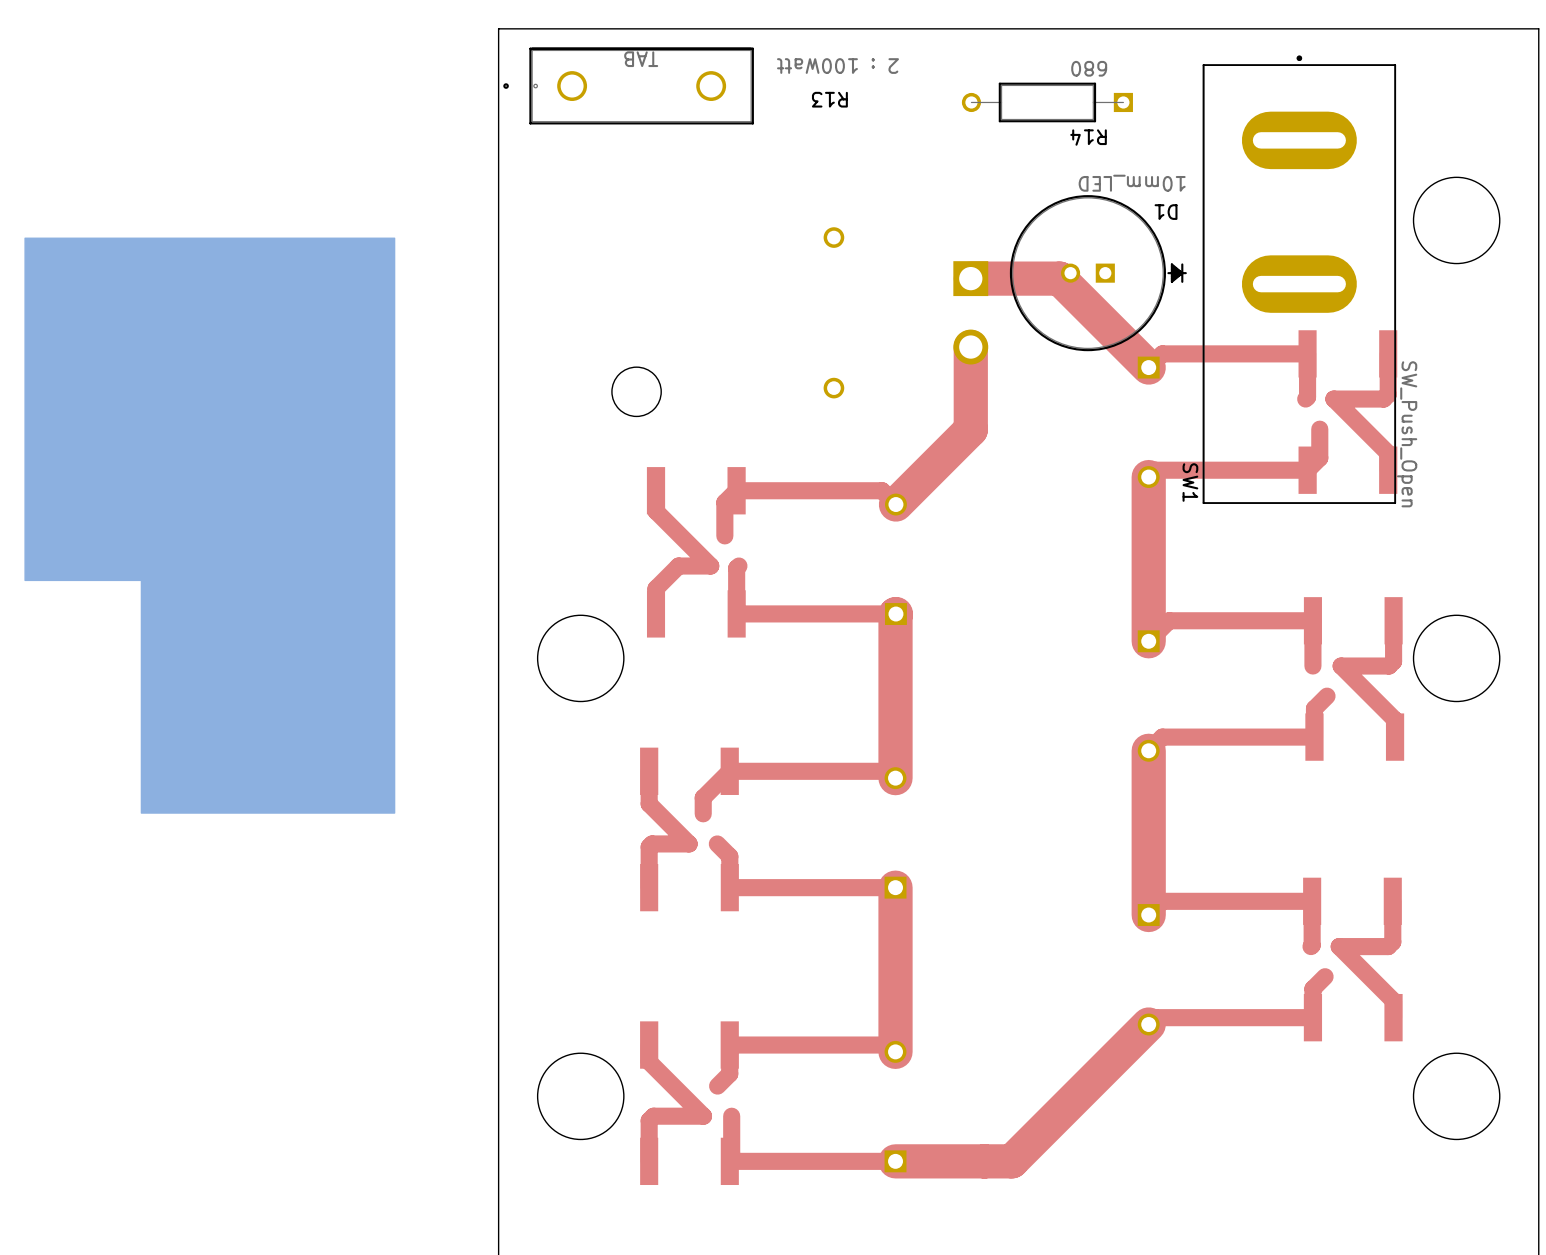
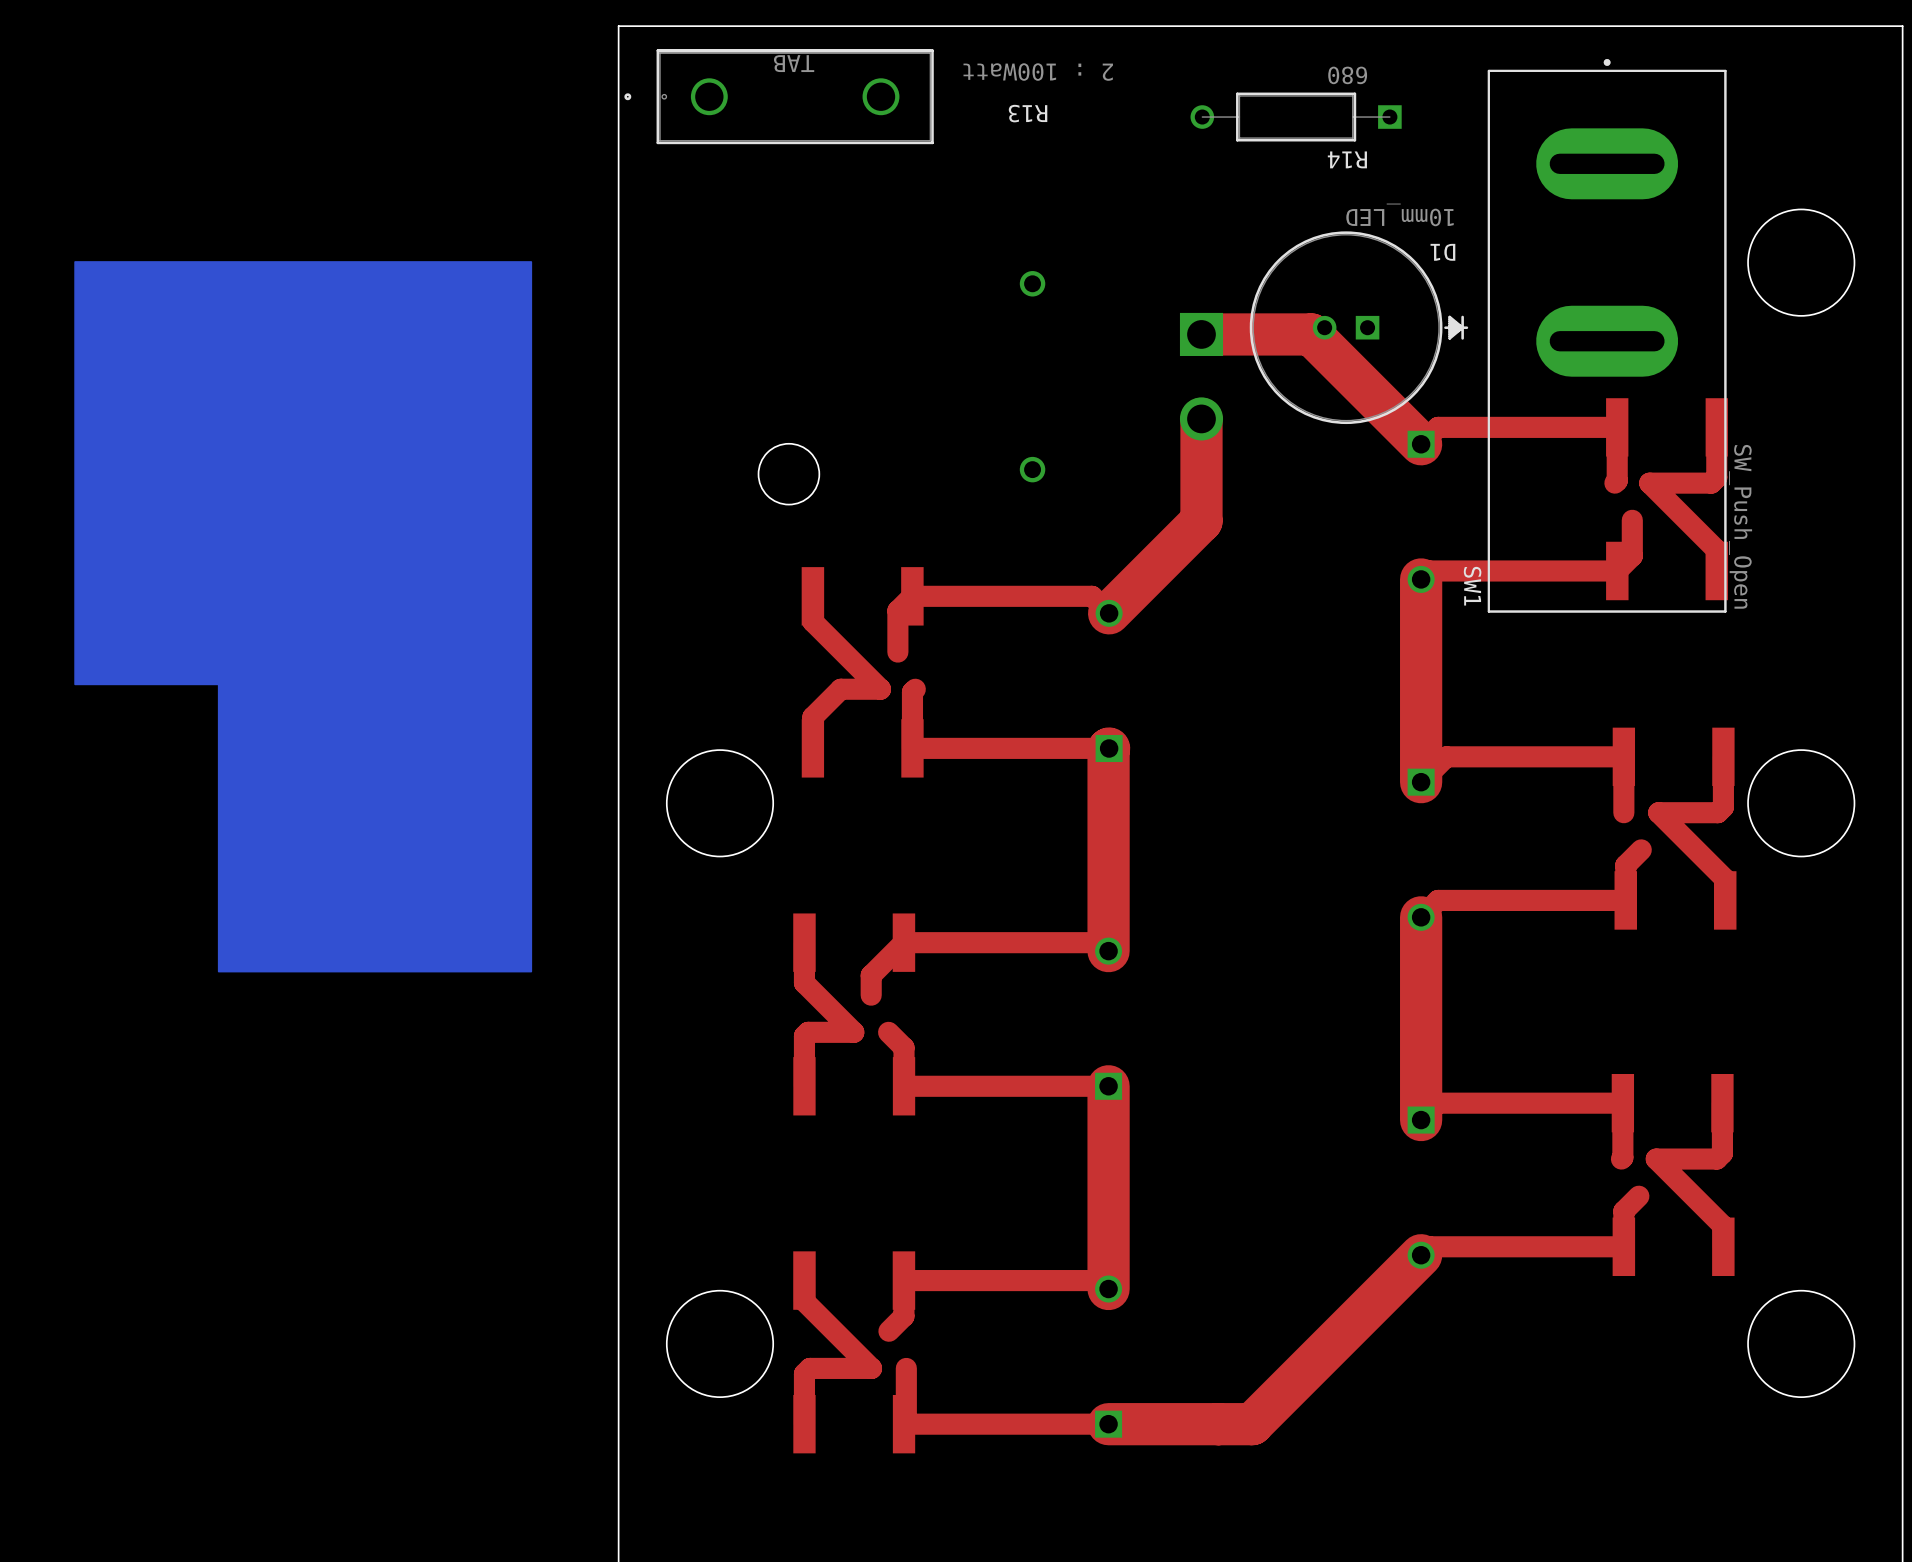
drawing position: (209, 525) -> (303, 616)

